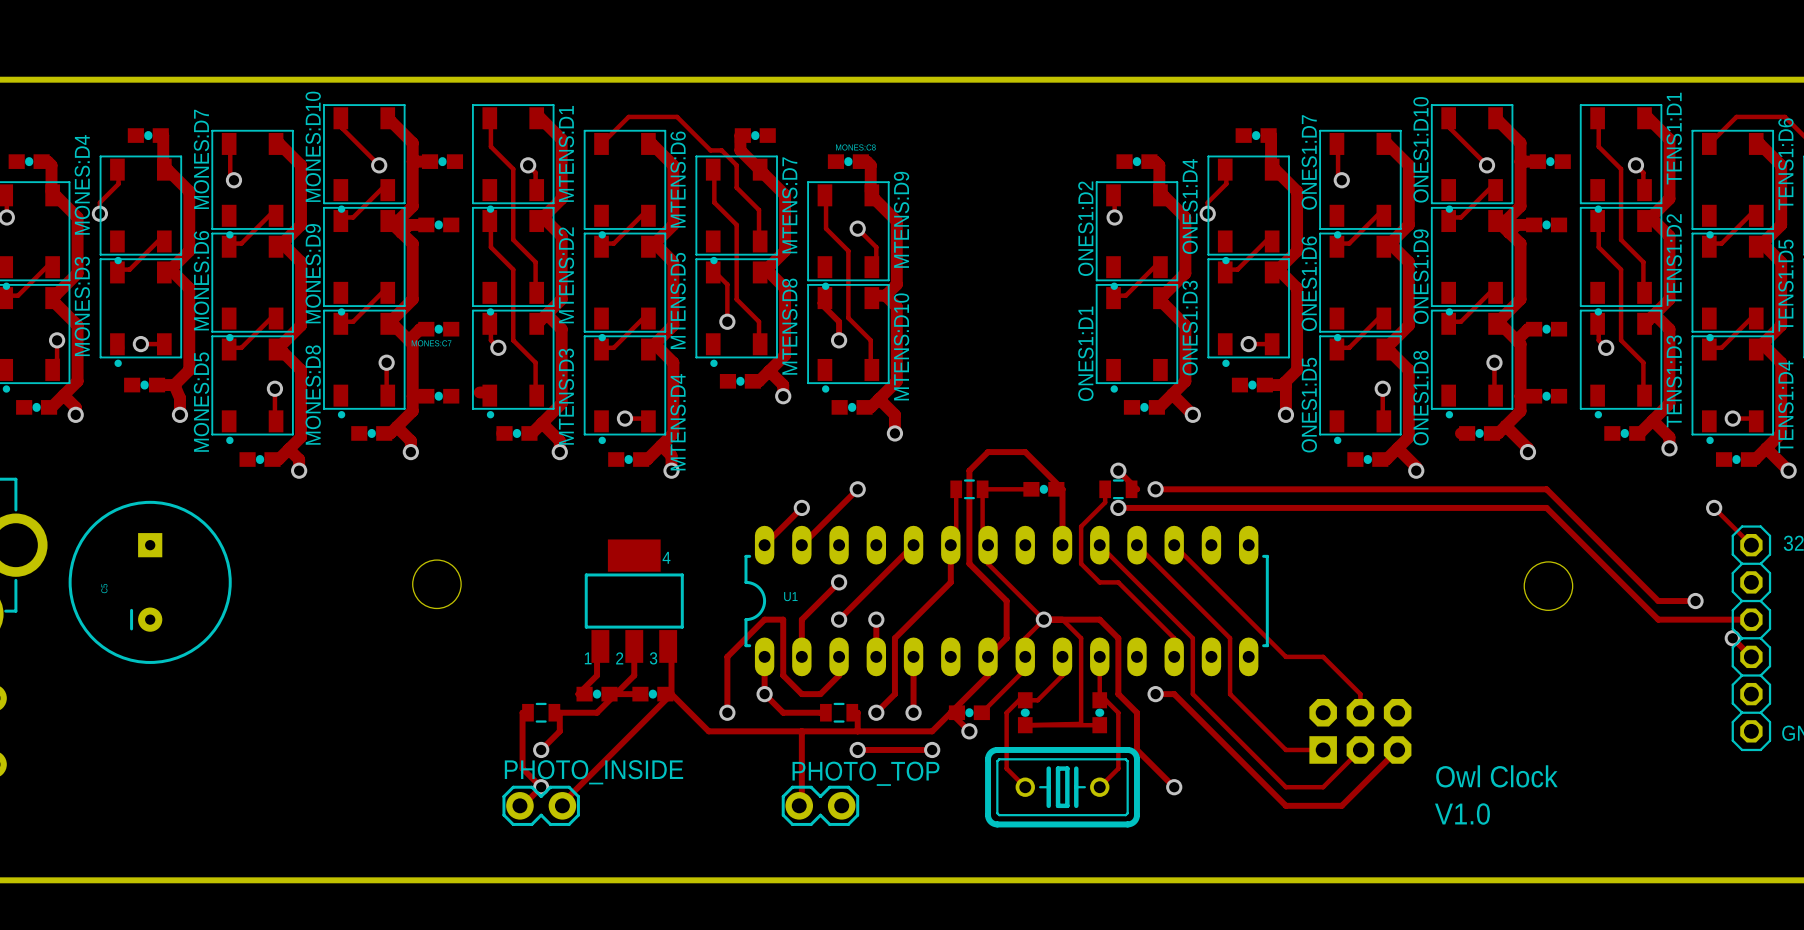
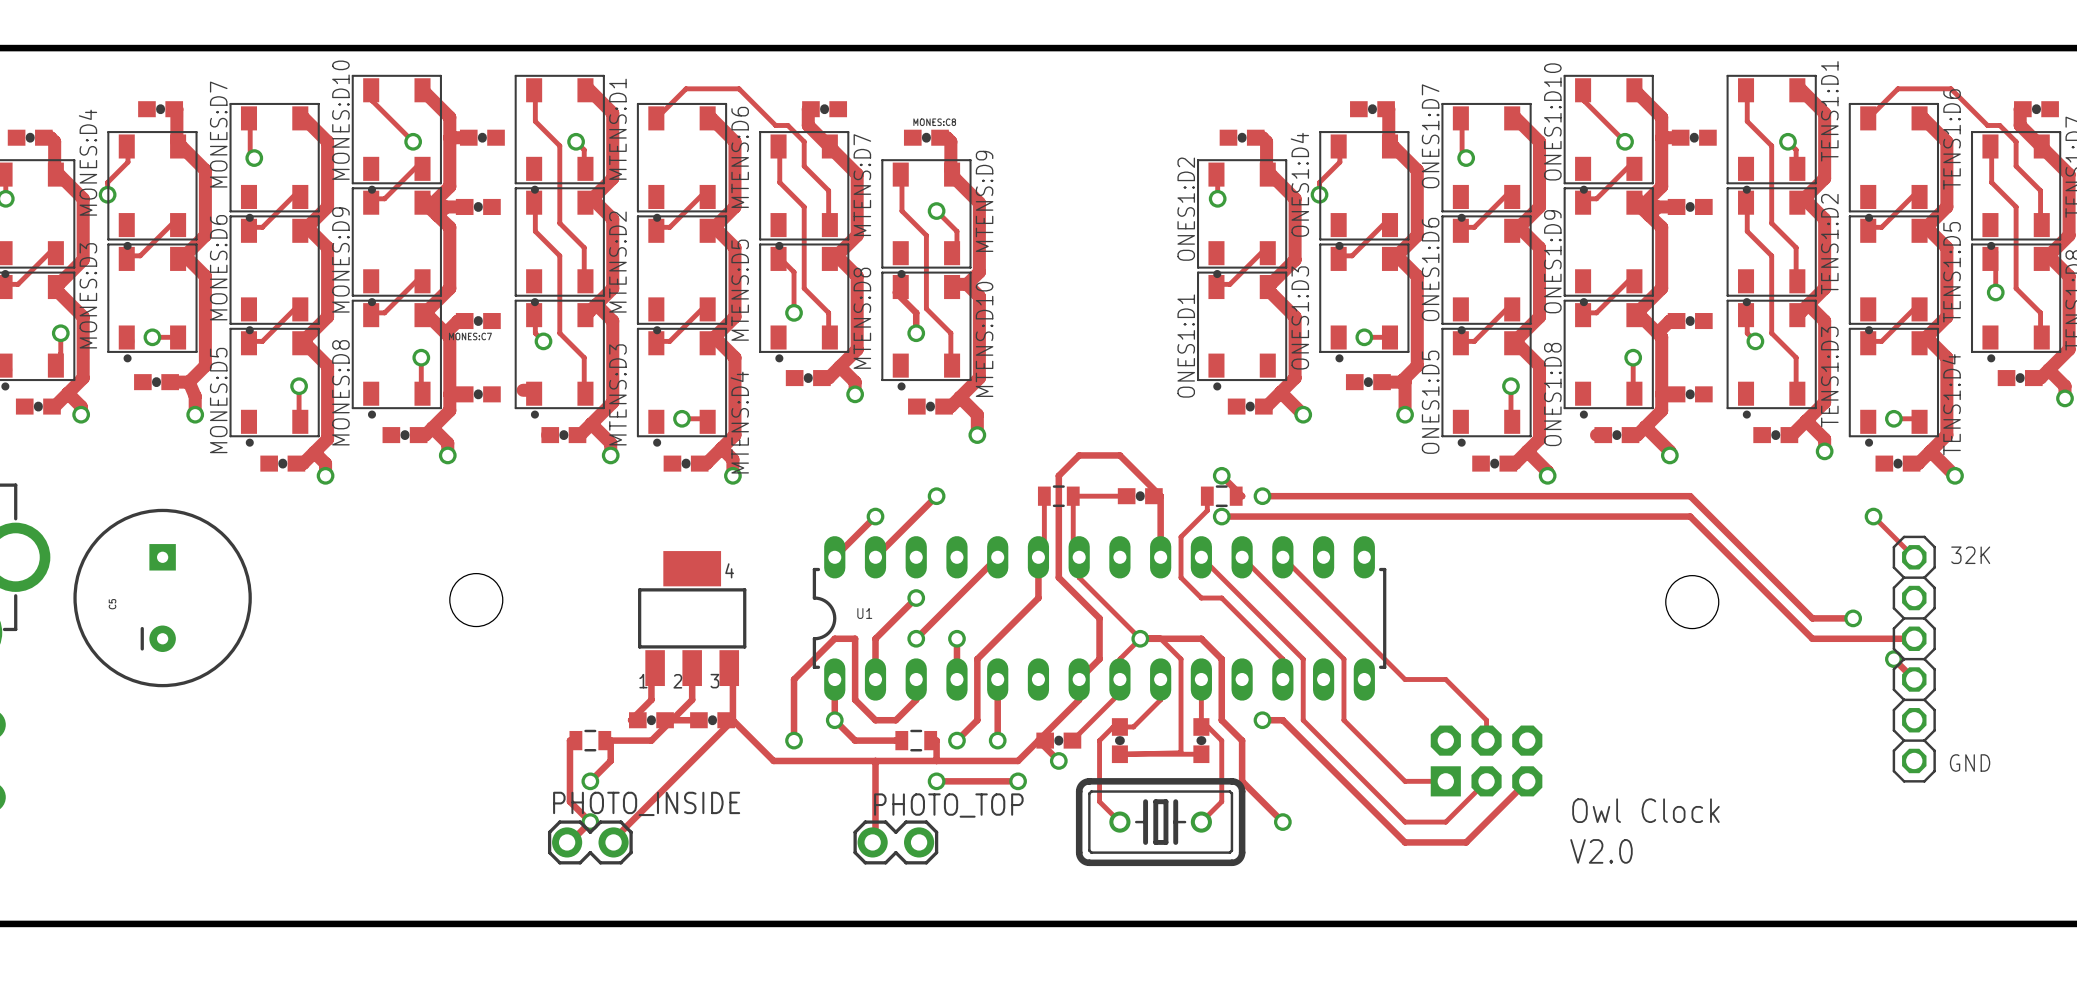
text: V1.0 (1462, 814) -> V2.0 (1601, 851)

